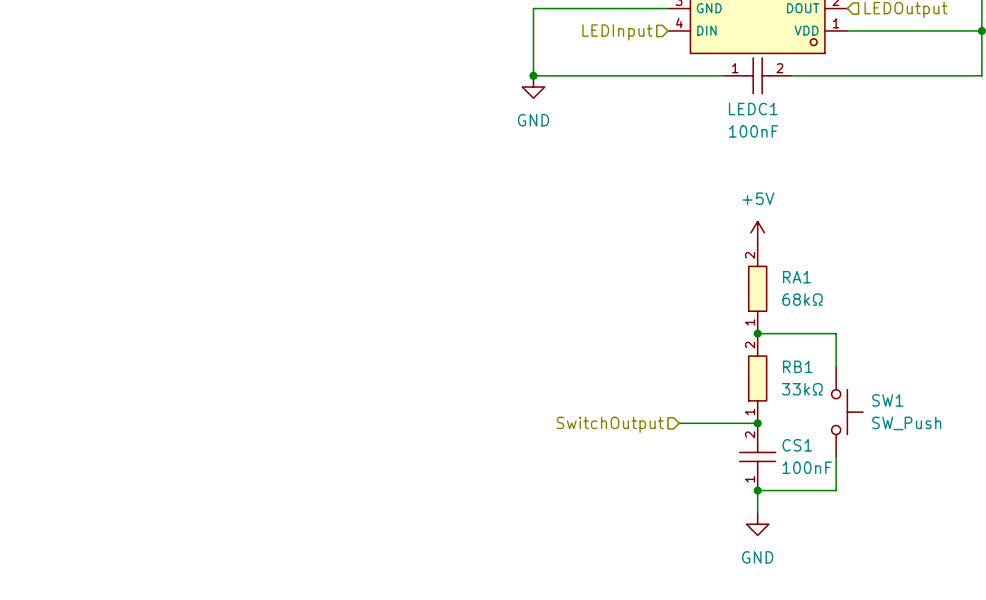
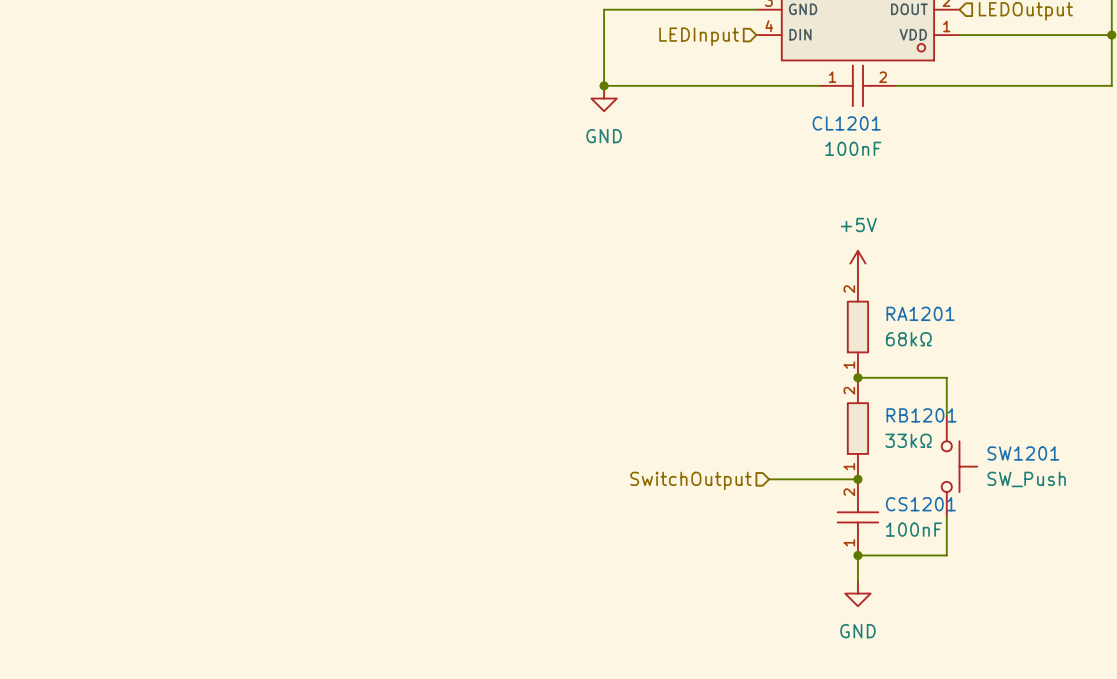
LEDC1 name: LEDC1 (753, 109) -> CL1201 (846, 123)
RA1 name: RA1 (796, 277) -> RA1201 (920, 313)
RB1 name: RB1 (797, 366) -> RB1201 (921, 415)
SW1 name: SW1 (887, 400) -> SW1201 (1023, 453)
CS1 name: CS1 (797, 445) -> CS1201 (920, 504)

